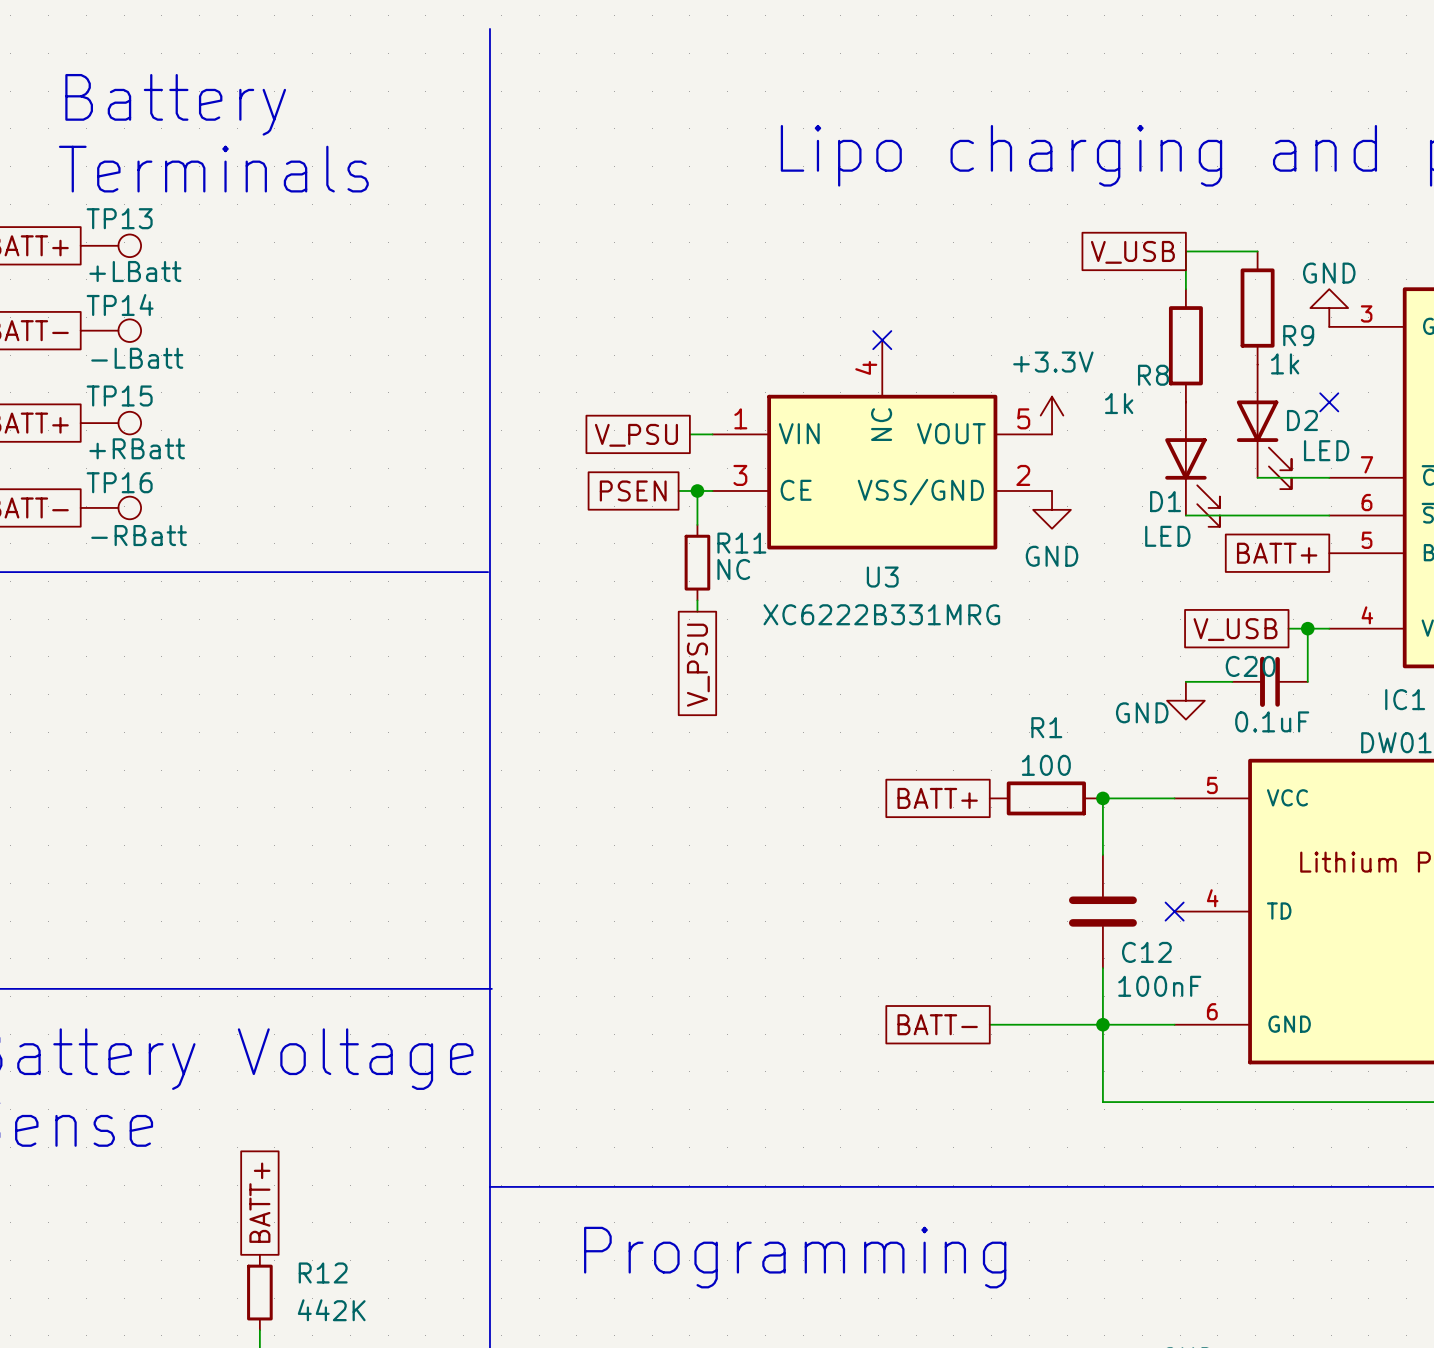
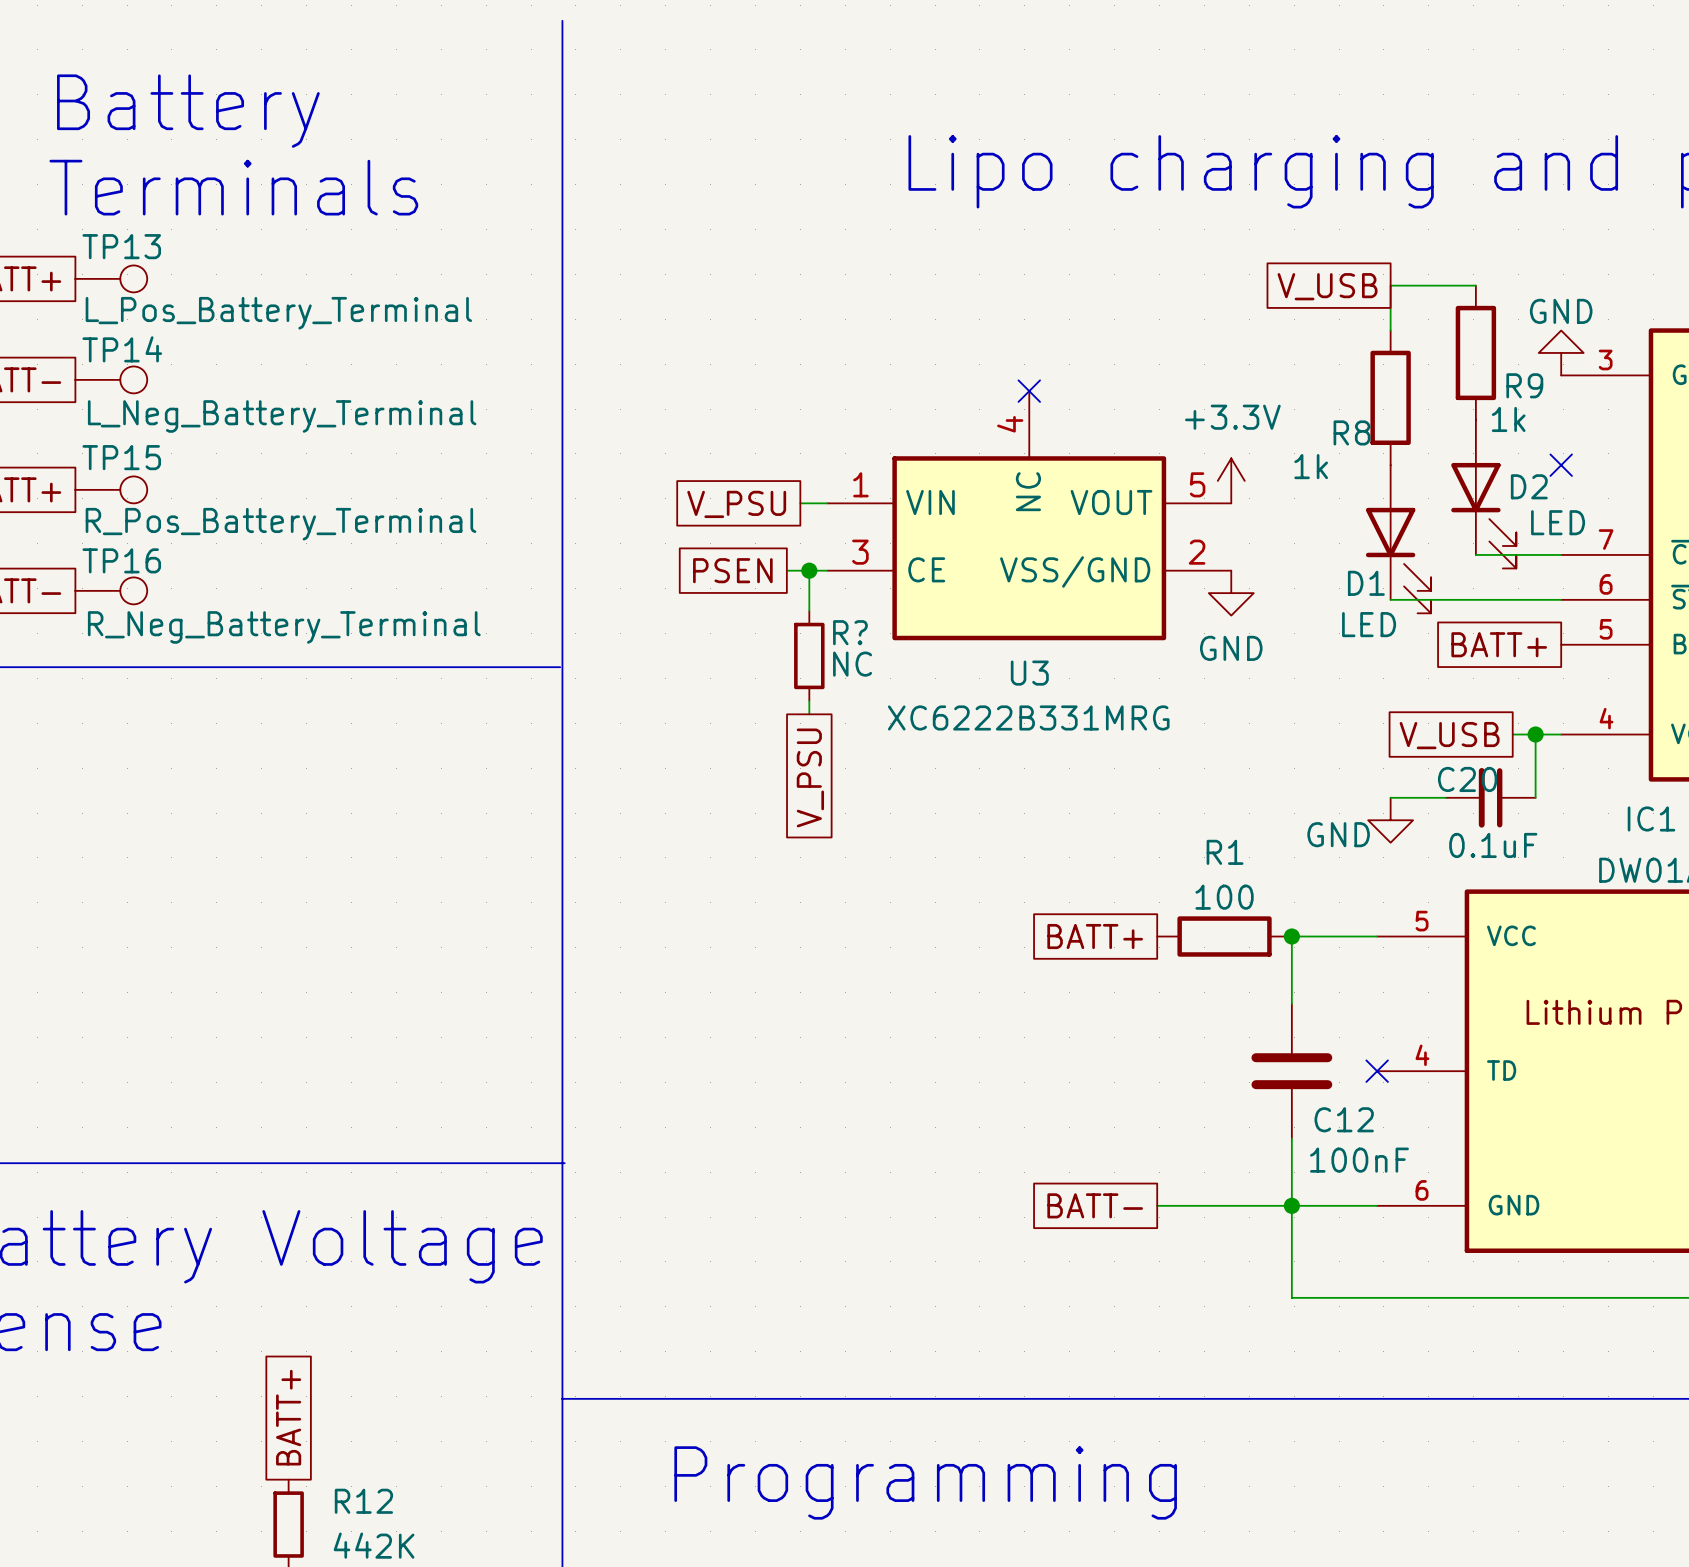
TP13 value: +LBatt (135, 271) -> L_Pos_Battery_Terminal (278, 313)
TP14 value: -LBatt (137, 358) -> L_Neg_Battery_Terminal (282, 416)
TP15 value: +RBatt (137, 448) -> R_Pos_Battery_Terminal (280, 524)
TP16 value: -RBatt (139, 535) -> R_Neg_Battery_Terminal (284, 627)
R11 name: R11 (741, 543) -> R? (850, 632)

